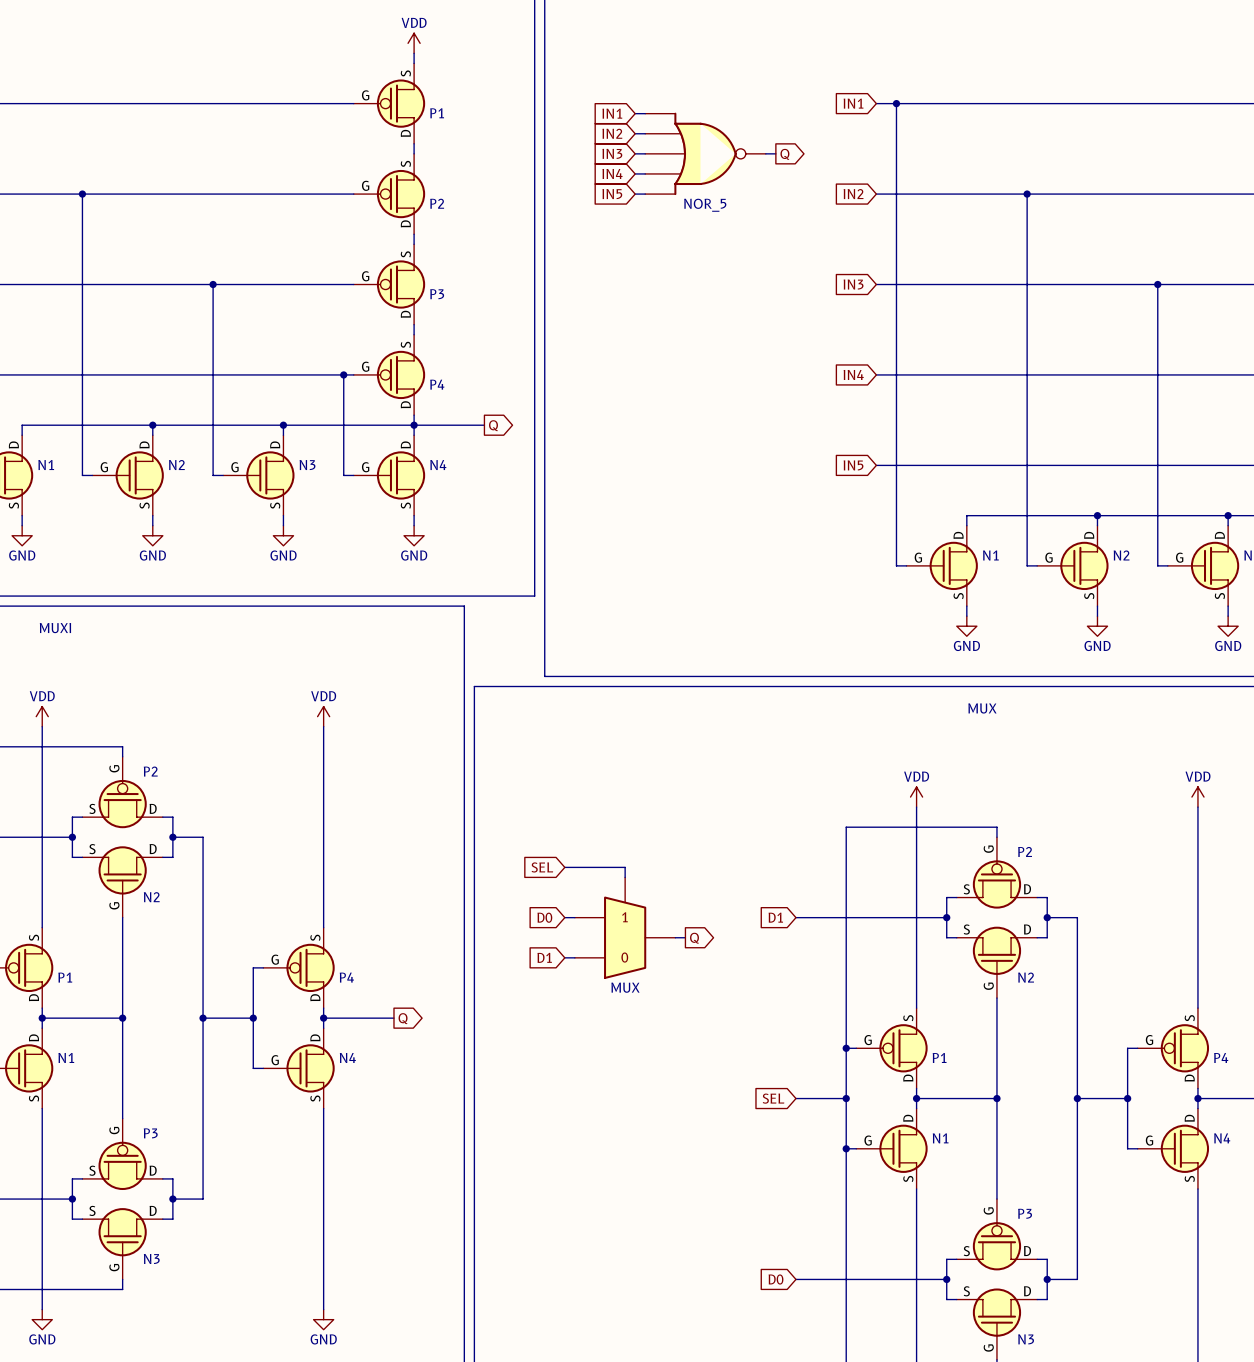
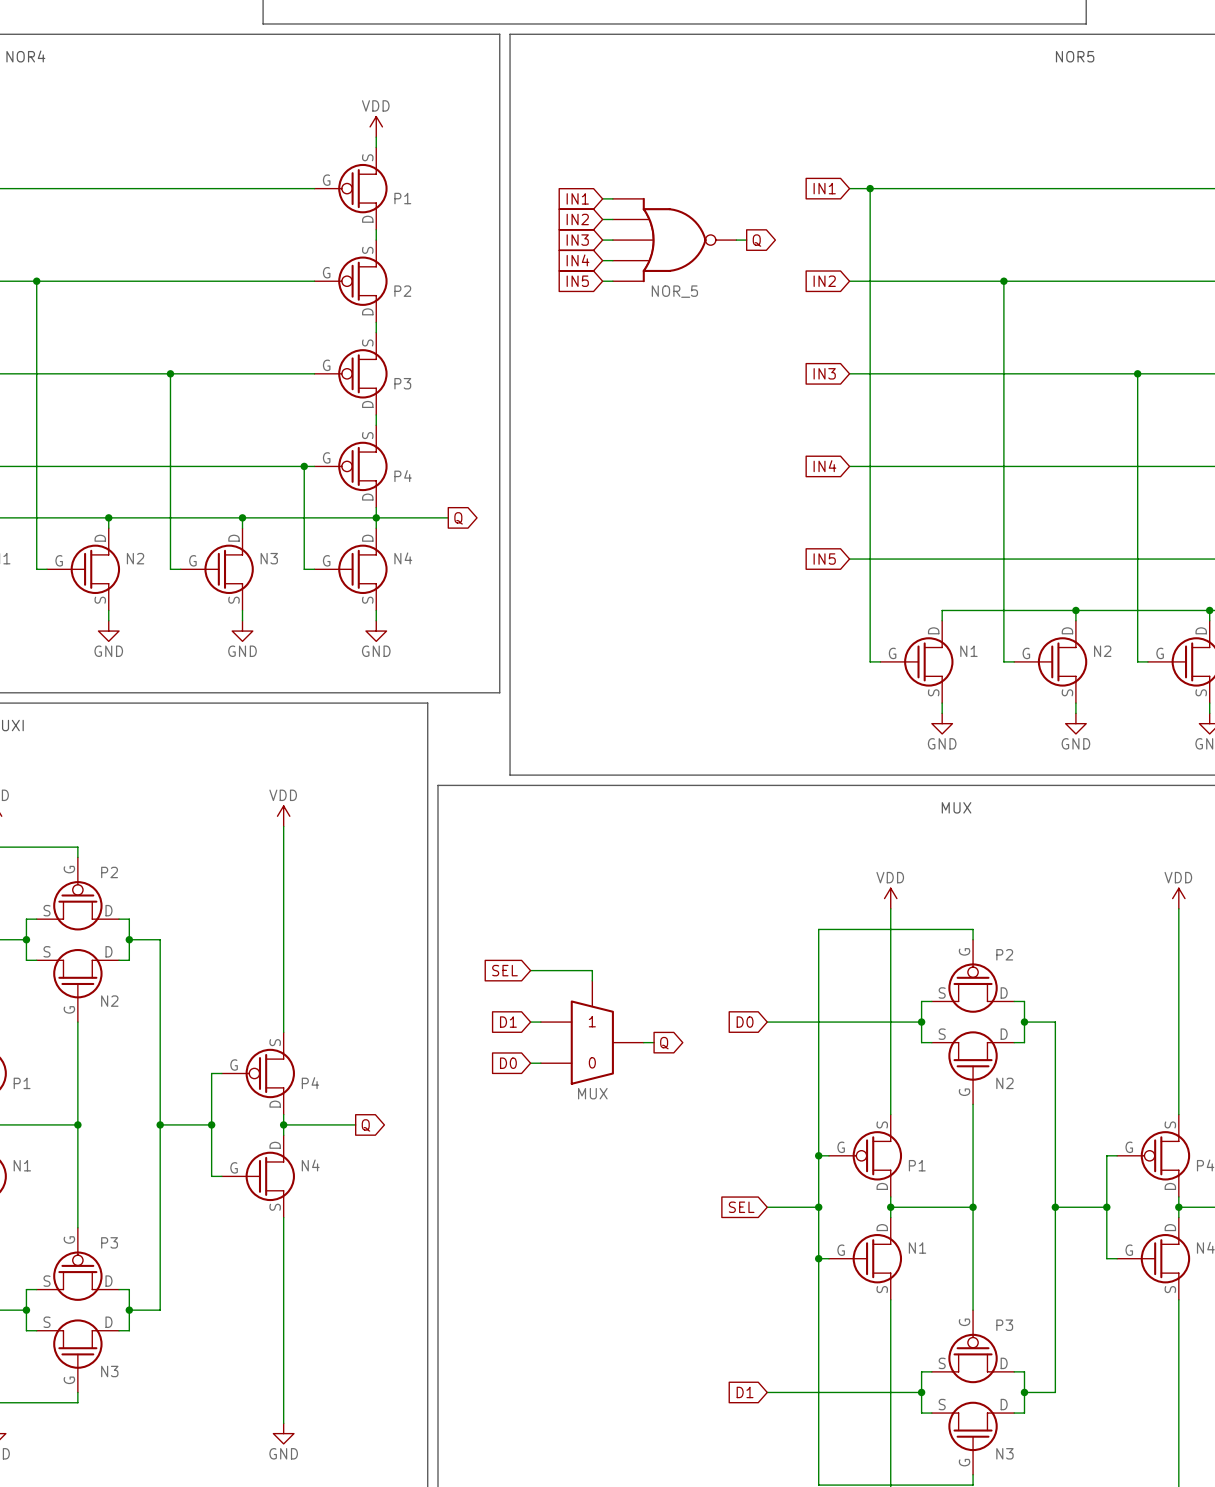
global label: D0 (544, 917) -> D1 (508, 1022)
global label: D1 (775, 917) -> D0 (745, 1022)
global label: D1 (544, 957) -> D0 (508, 1063)
global label: D0 (776, 1279) -> D1 (745, 1392)

